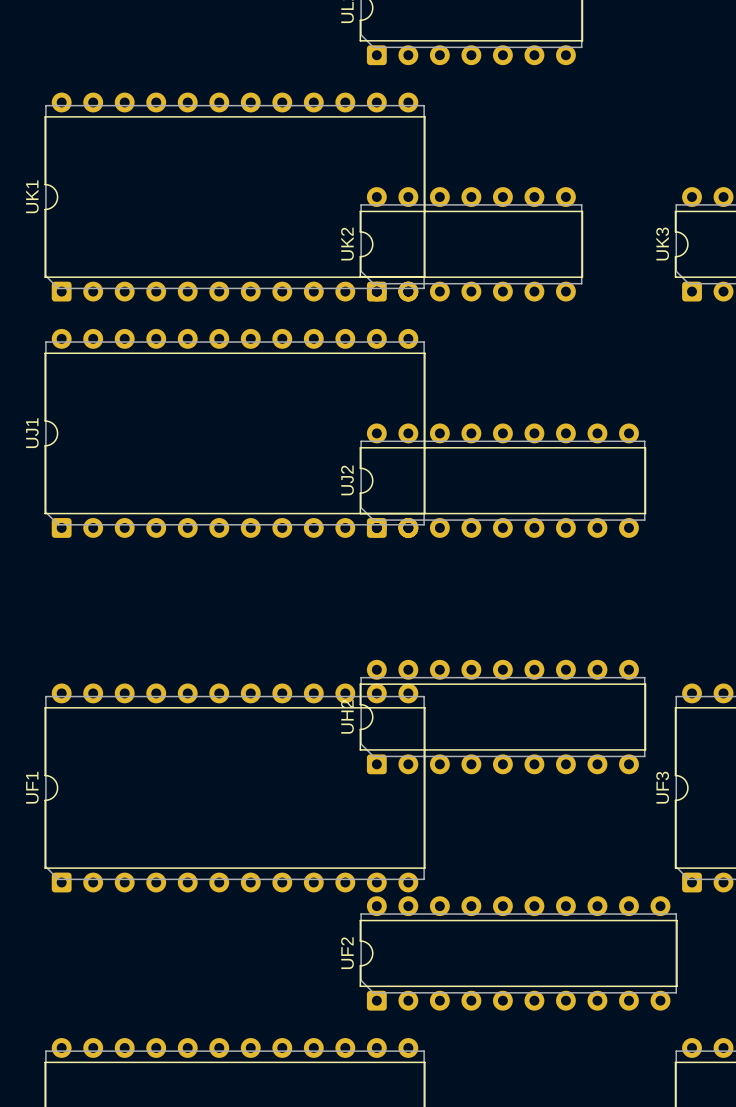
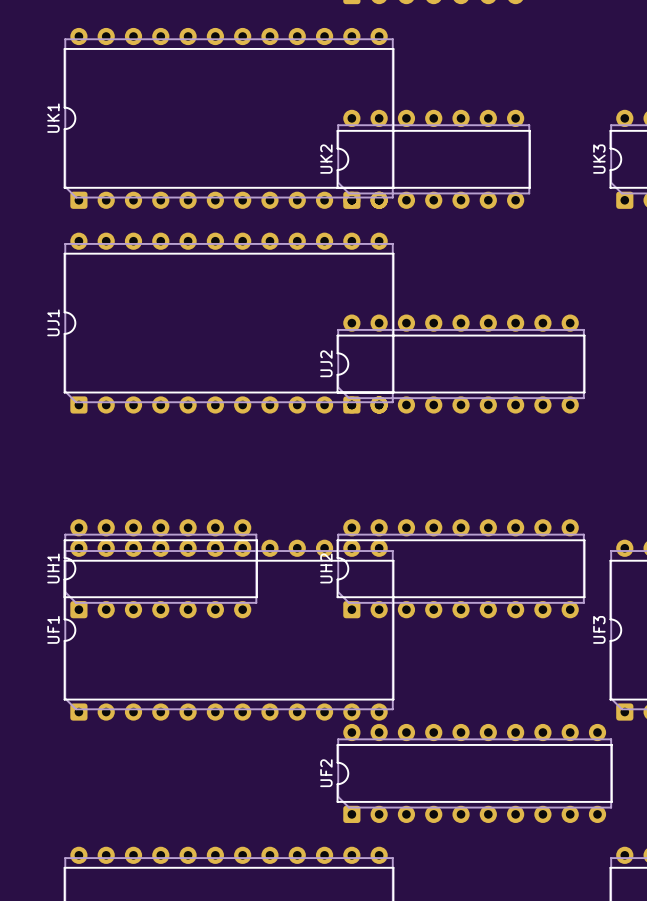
UH1: none -> (160, 568)

